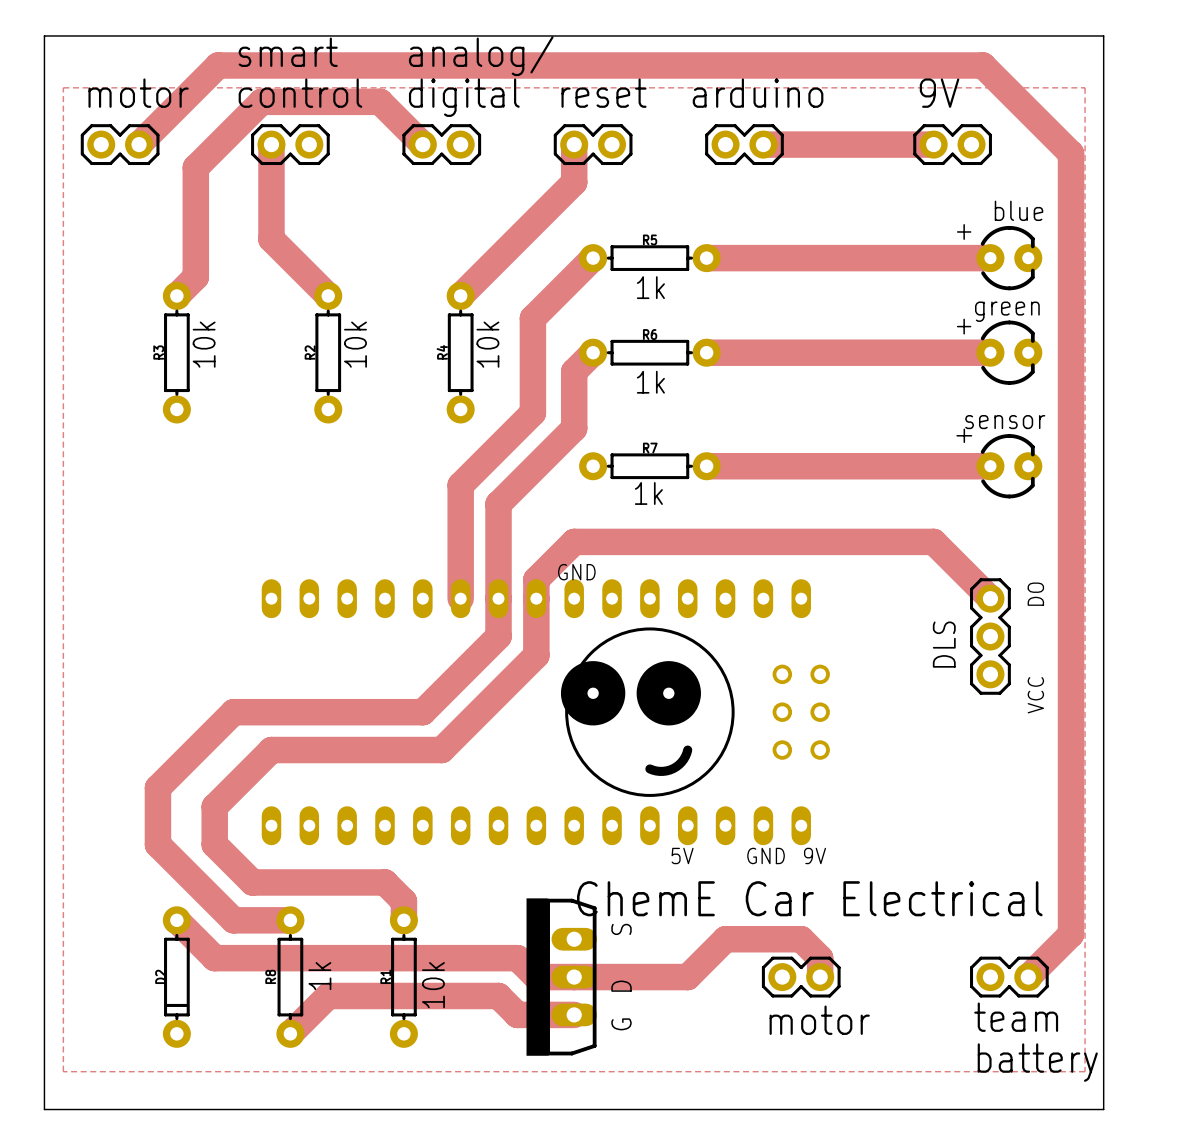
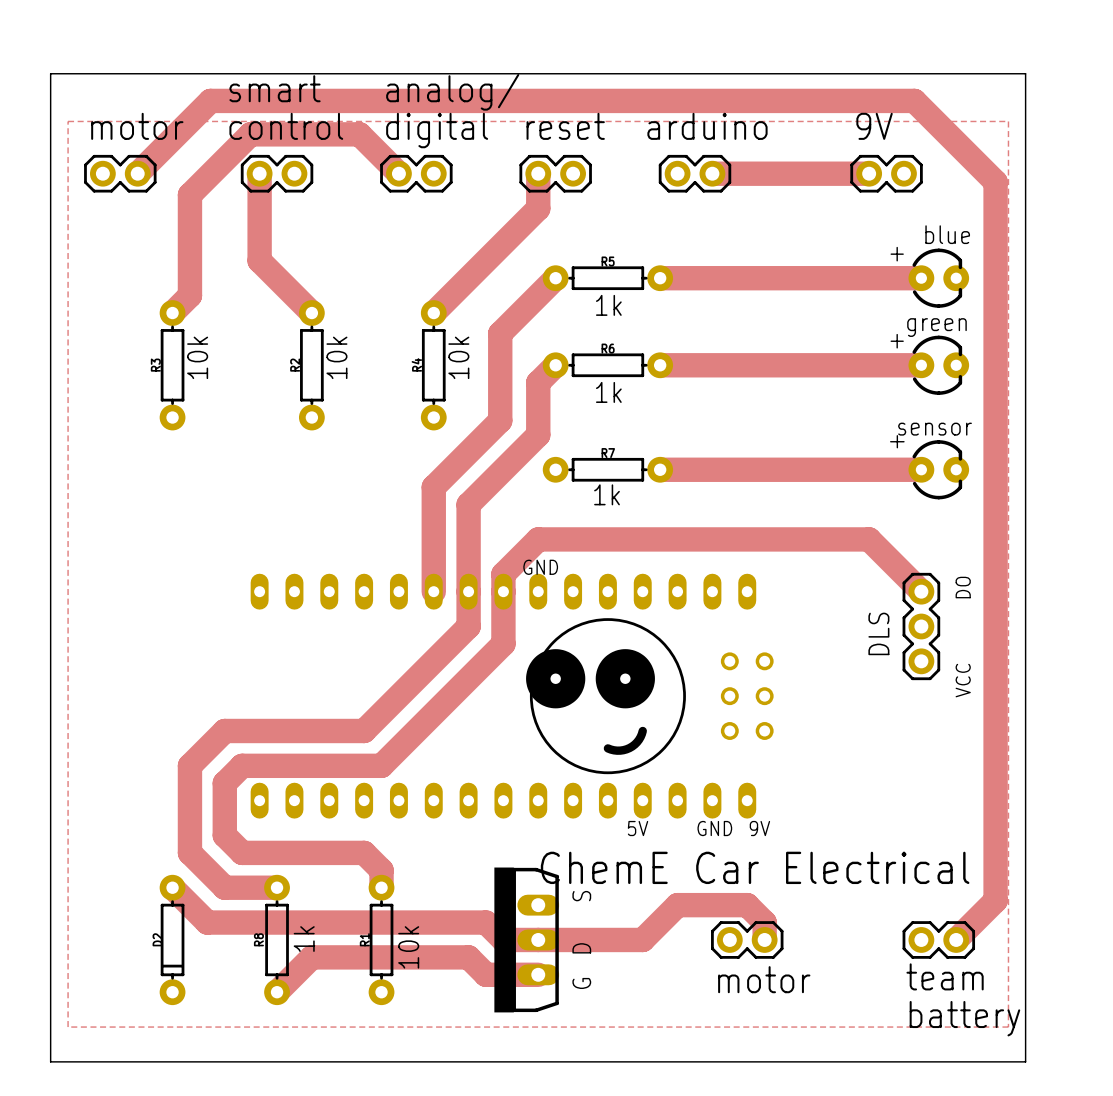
track: (422, 712) (233, 712) (157, 787) (157, 844) (195, 882) -> none
track: (271, 750) (214, 806) (214, 844) (233, 863) -> (259, 730) (224, 730) (189, 765) (189, 852)
track: (385, 750) (441, 750) -> (364, 730) (398, 696)
track: none -> (416, 730) (381, 765) (242, 765) (224, 783) (224, 835)

